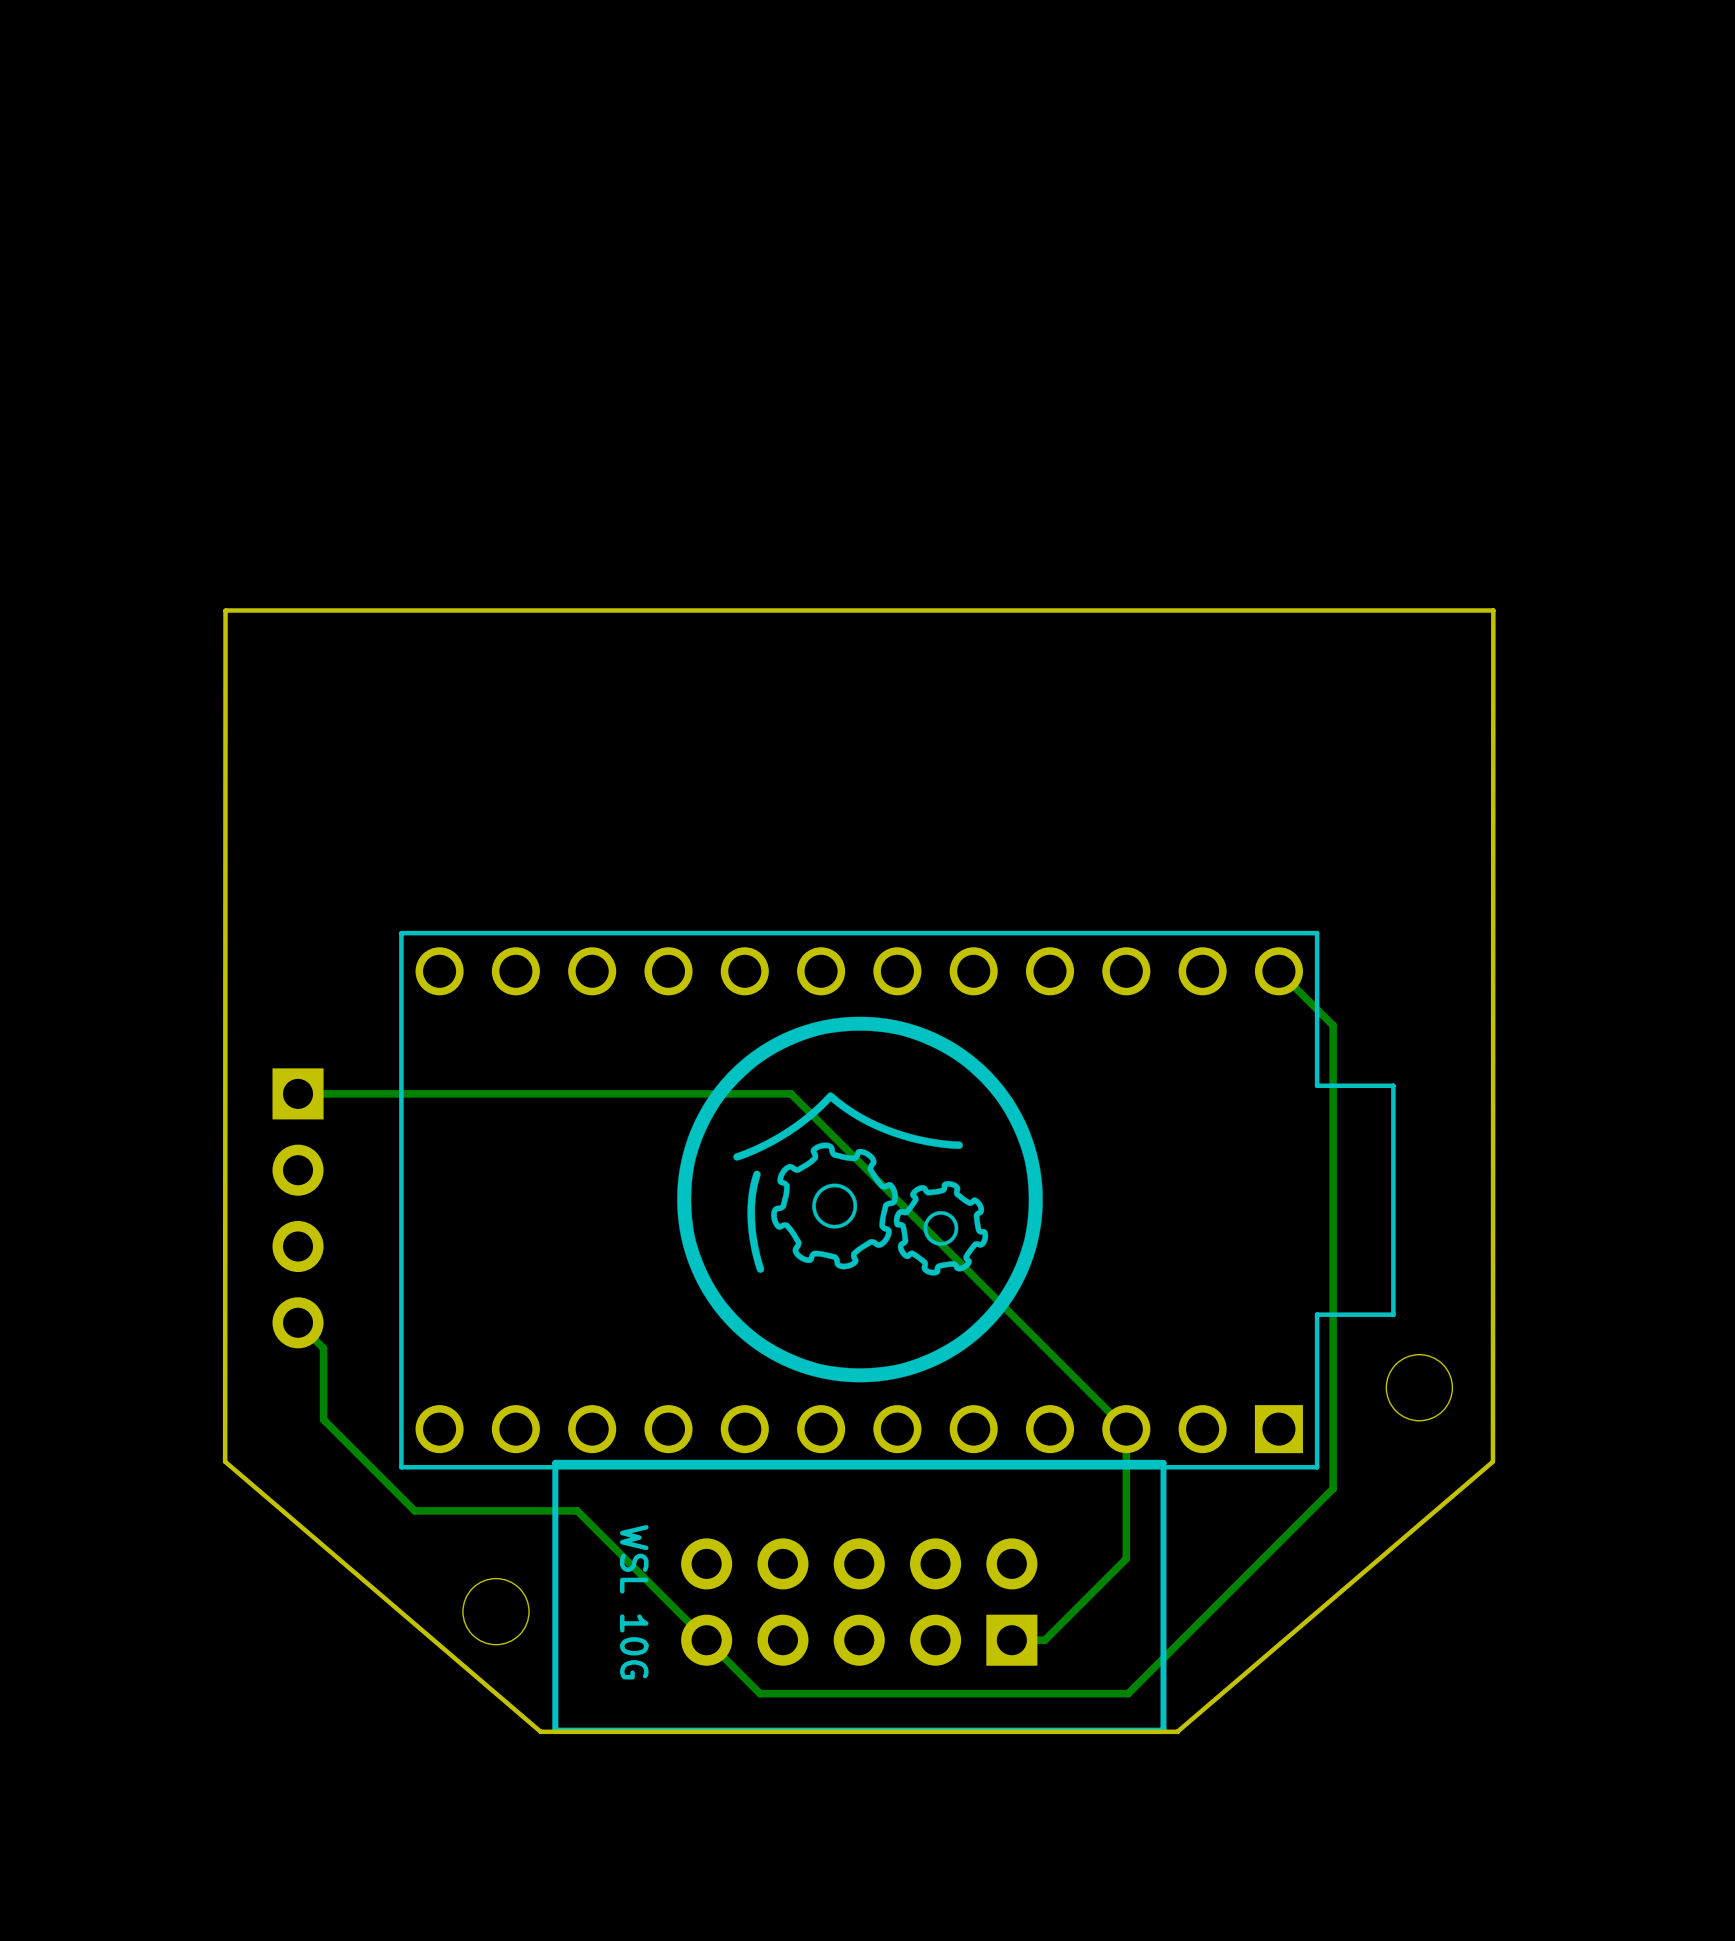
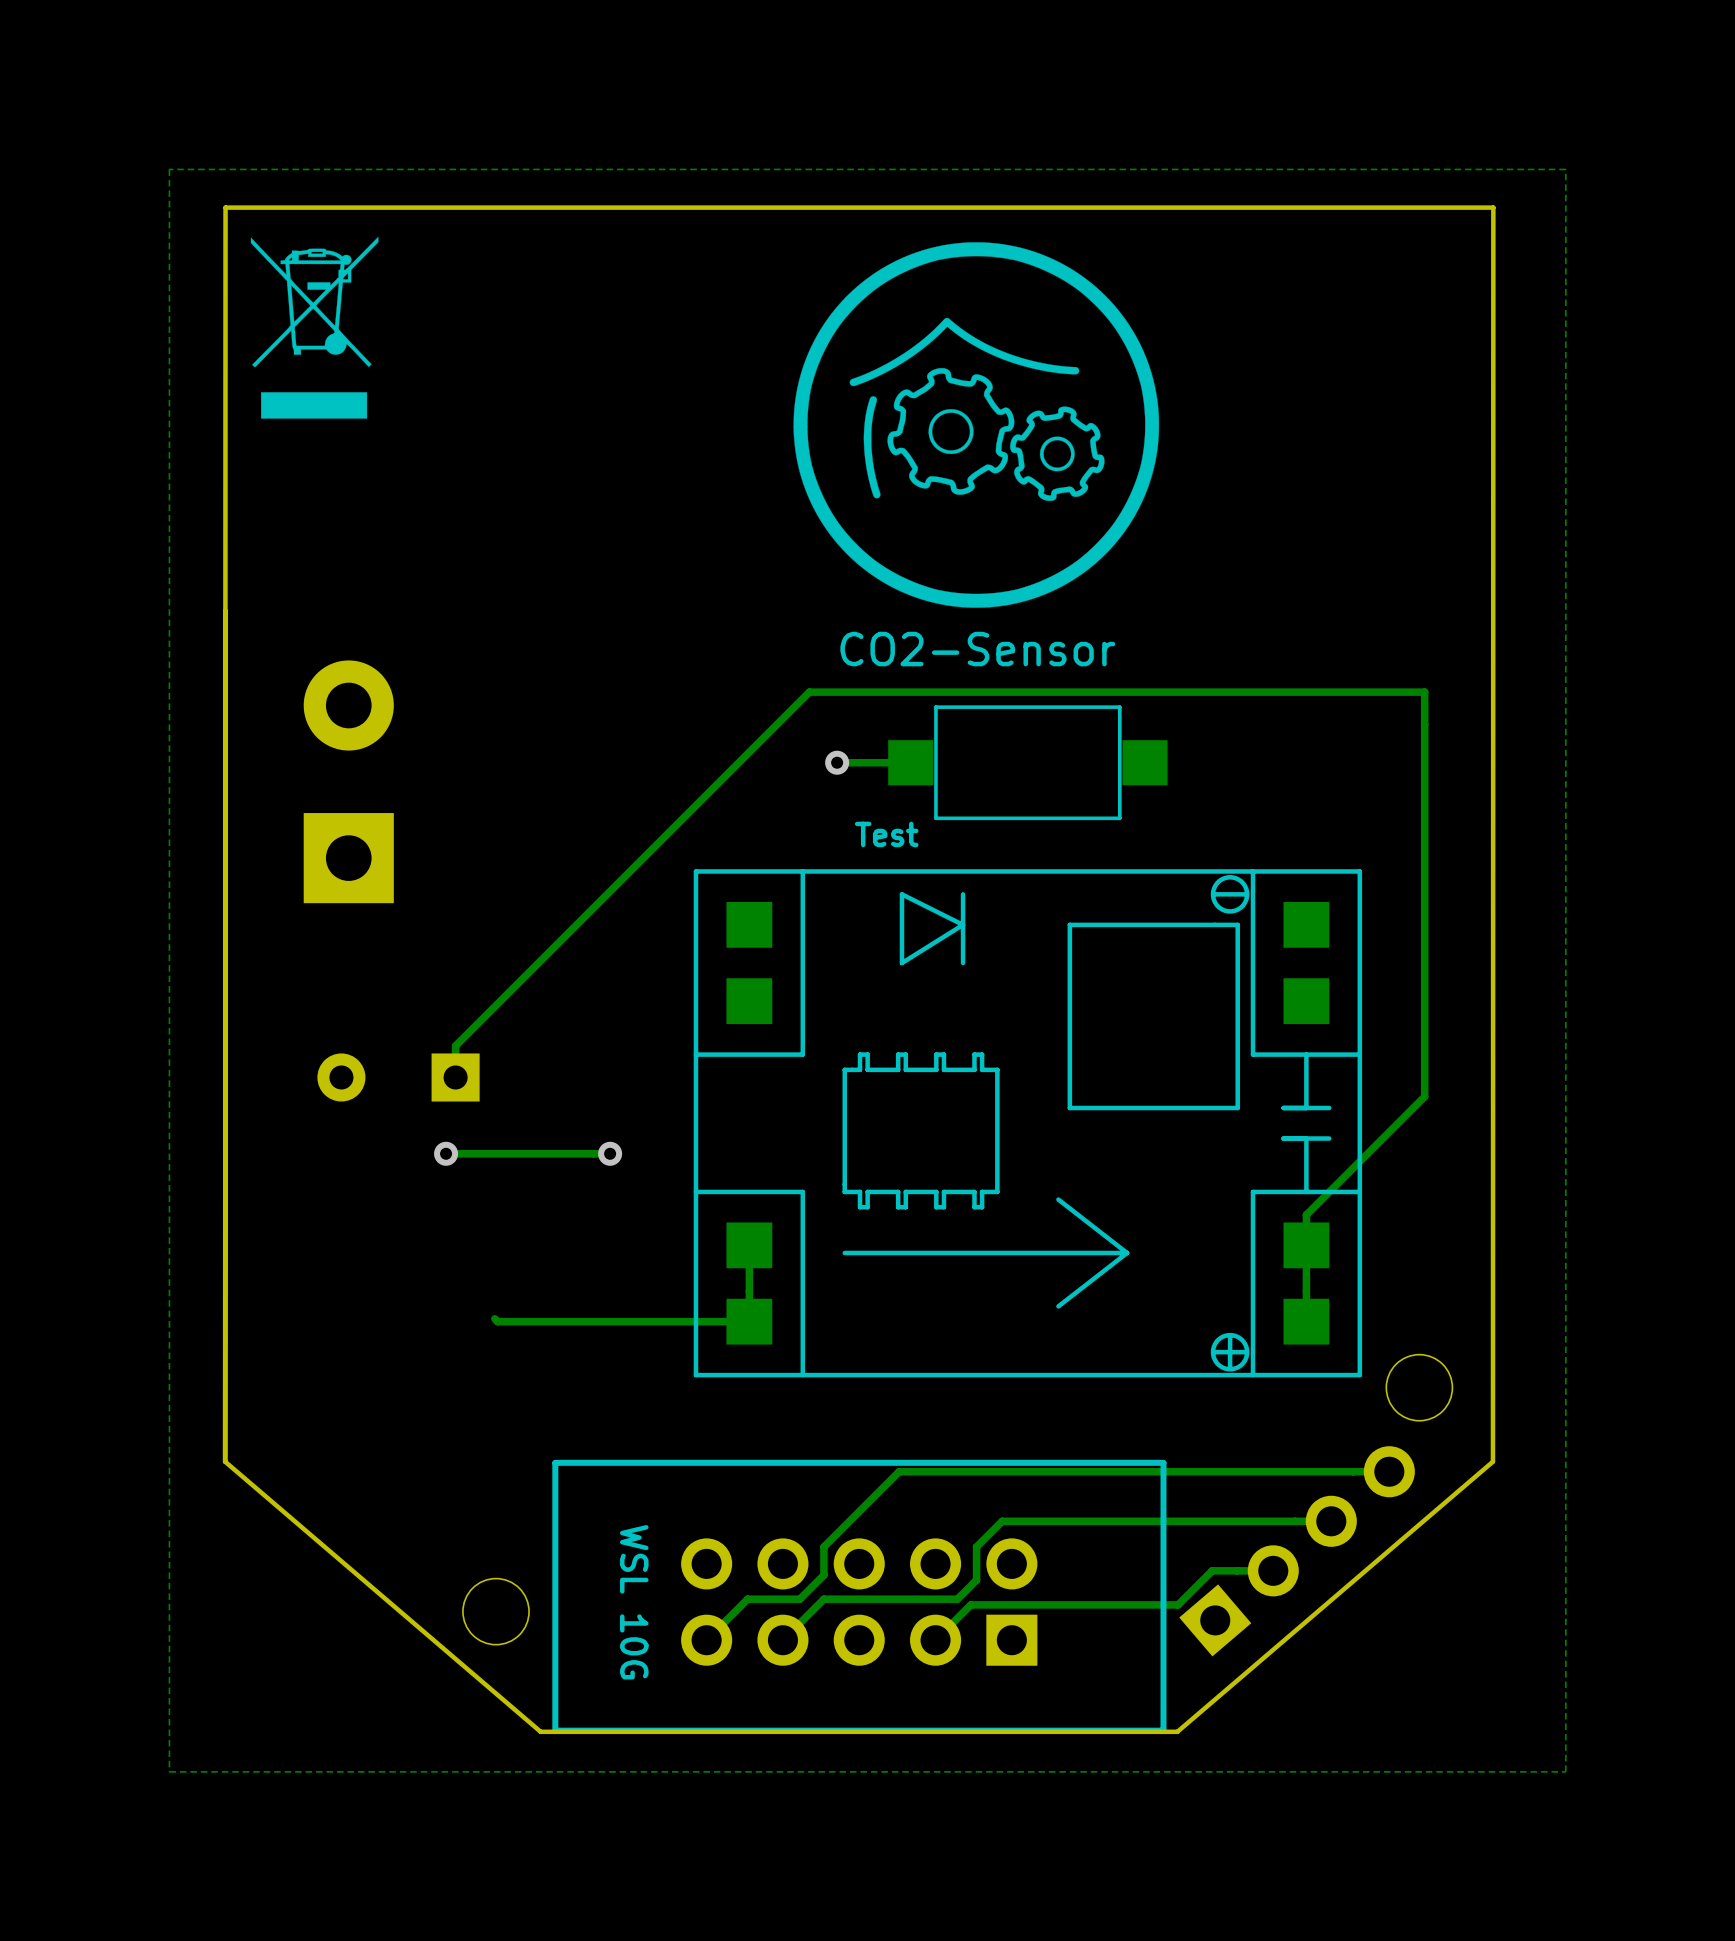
zone outline: none -> (1565, 169) (169, 169) (169, 1771) (1565, 1771) (1565, 169)
drawing: none -> [250, 236, 379, 419]
drawing: none -> [793, 242, 1160, 608]
board edge: (225, 610) (1493, 610) (1492, 1461) -> (225, 1461) (225, 207) (1493, 207) (1492, 1461)
text: none -> CO2-Sensor (977, 649)
via: none -> (837, 762)
track: none -> (910, 762) (837, 762)
part: none -> (1027, 762)
part: none -> (348, 781)
text: none -> Test (886, 834)
track: (1278, 971) (1333, 1025) (1333, 1488) (1128, 1693) (760, 1693) (577, 1510) (414, 1510) (323, 1419) (323, 1348) (298, 1322) -> none
drawing: [677, 1016, 1043, 1383] -> none
part: none -> (398, 1077)
track: none -> (455, 1077) (455, 1045) (809, 692) (1424, 692) (1424, 1096) (1306, 1214) (1306, 1321)
track: (298, 1093) (791, 1093) (1126, 1429) (1126, 1558) (1044, 1640) (1011, 1640) -> none
part: none -> (1027, 1123)
via: none -> (446, 1153)
track: none -> (610, 1153) (446, 1153)
via: none -> (610, 1153)
part: (897, 1200) -> none
part: (298, 1208) -> none
track: none -> (749, 1245) (749, 1321) (497, 1321) (494, 1318)
track: none -> (1389, 1471) (899, 1471) (823, 1546) (823, 1575) (799, 1599) (747, 1599) (706, 1640)
track: none -> (1331, 1521) (1002, 1521) (976, 1546) (976, 1580) (957, 1599) (823, 1599) (782, 1640)
part: none -> (1297, 1551)
track: none -> (1273, 1570) (1212, 1570) (1178, 1604) (970, 1604) (935, 1640)

